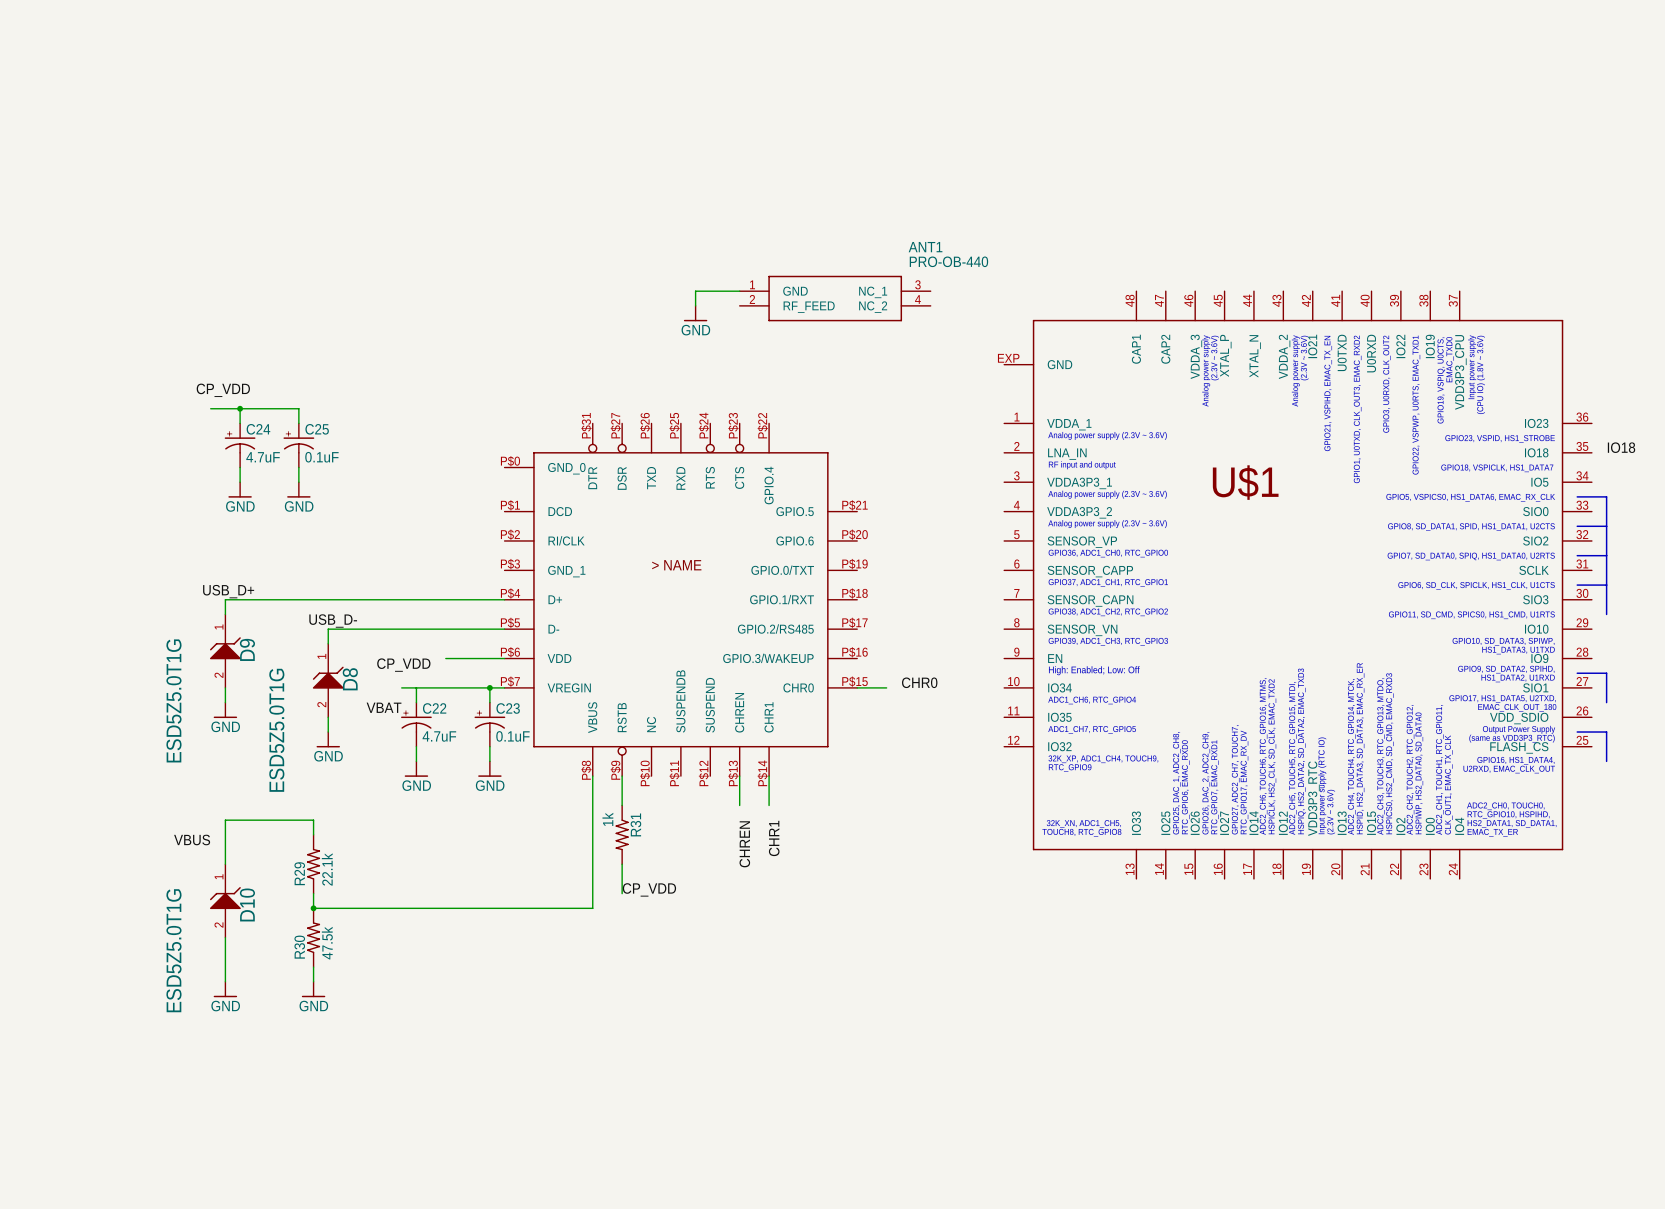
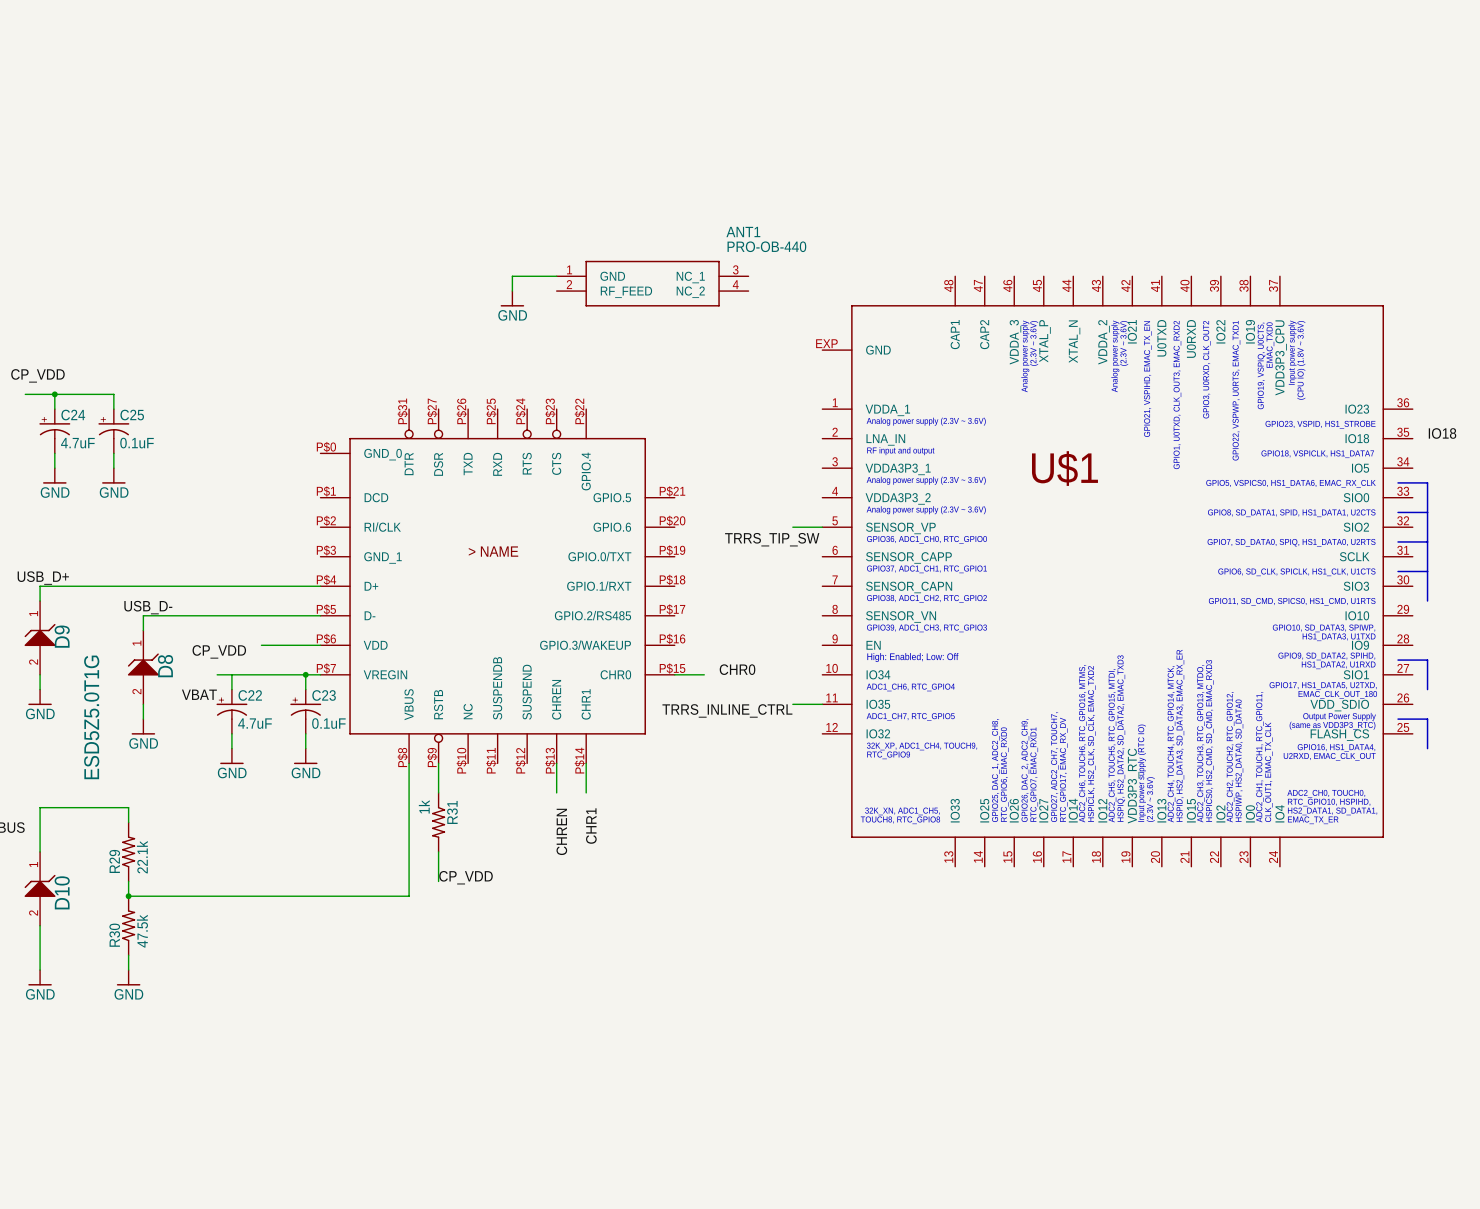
wire: none -> (792, 527) (822, 527)
label: none -> TRRS_TIP_SW (772, 539)
wire: none -> (792, 704) (822, 704)
label: none -> TRRS_INLINE_CTRL (727, 710)

